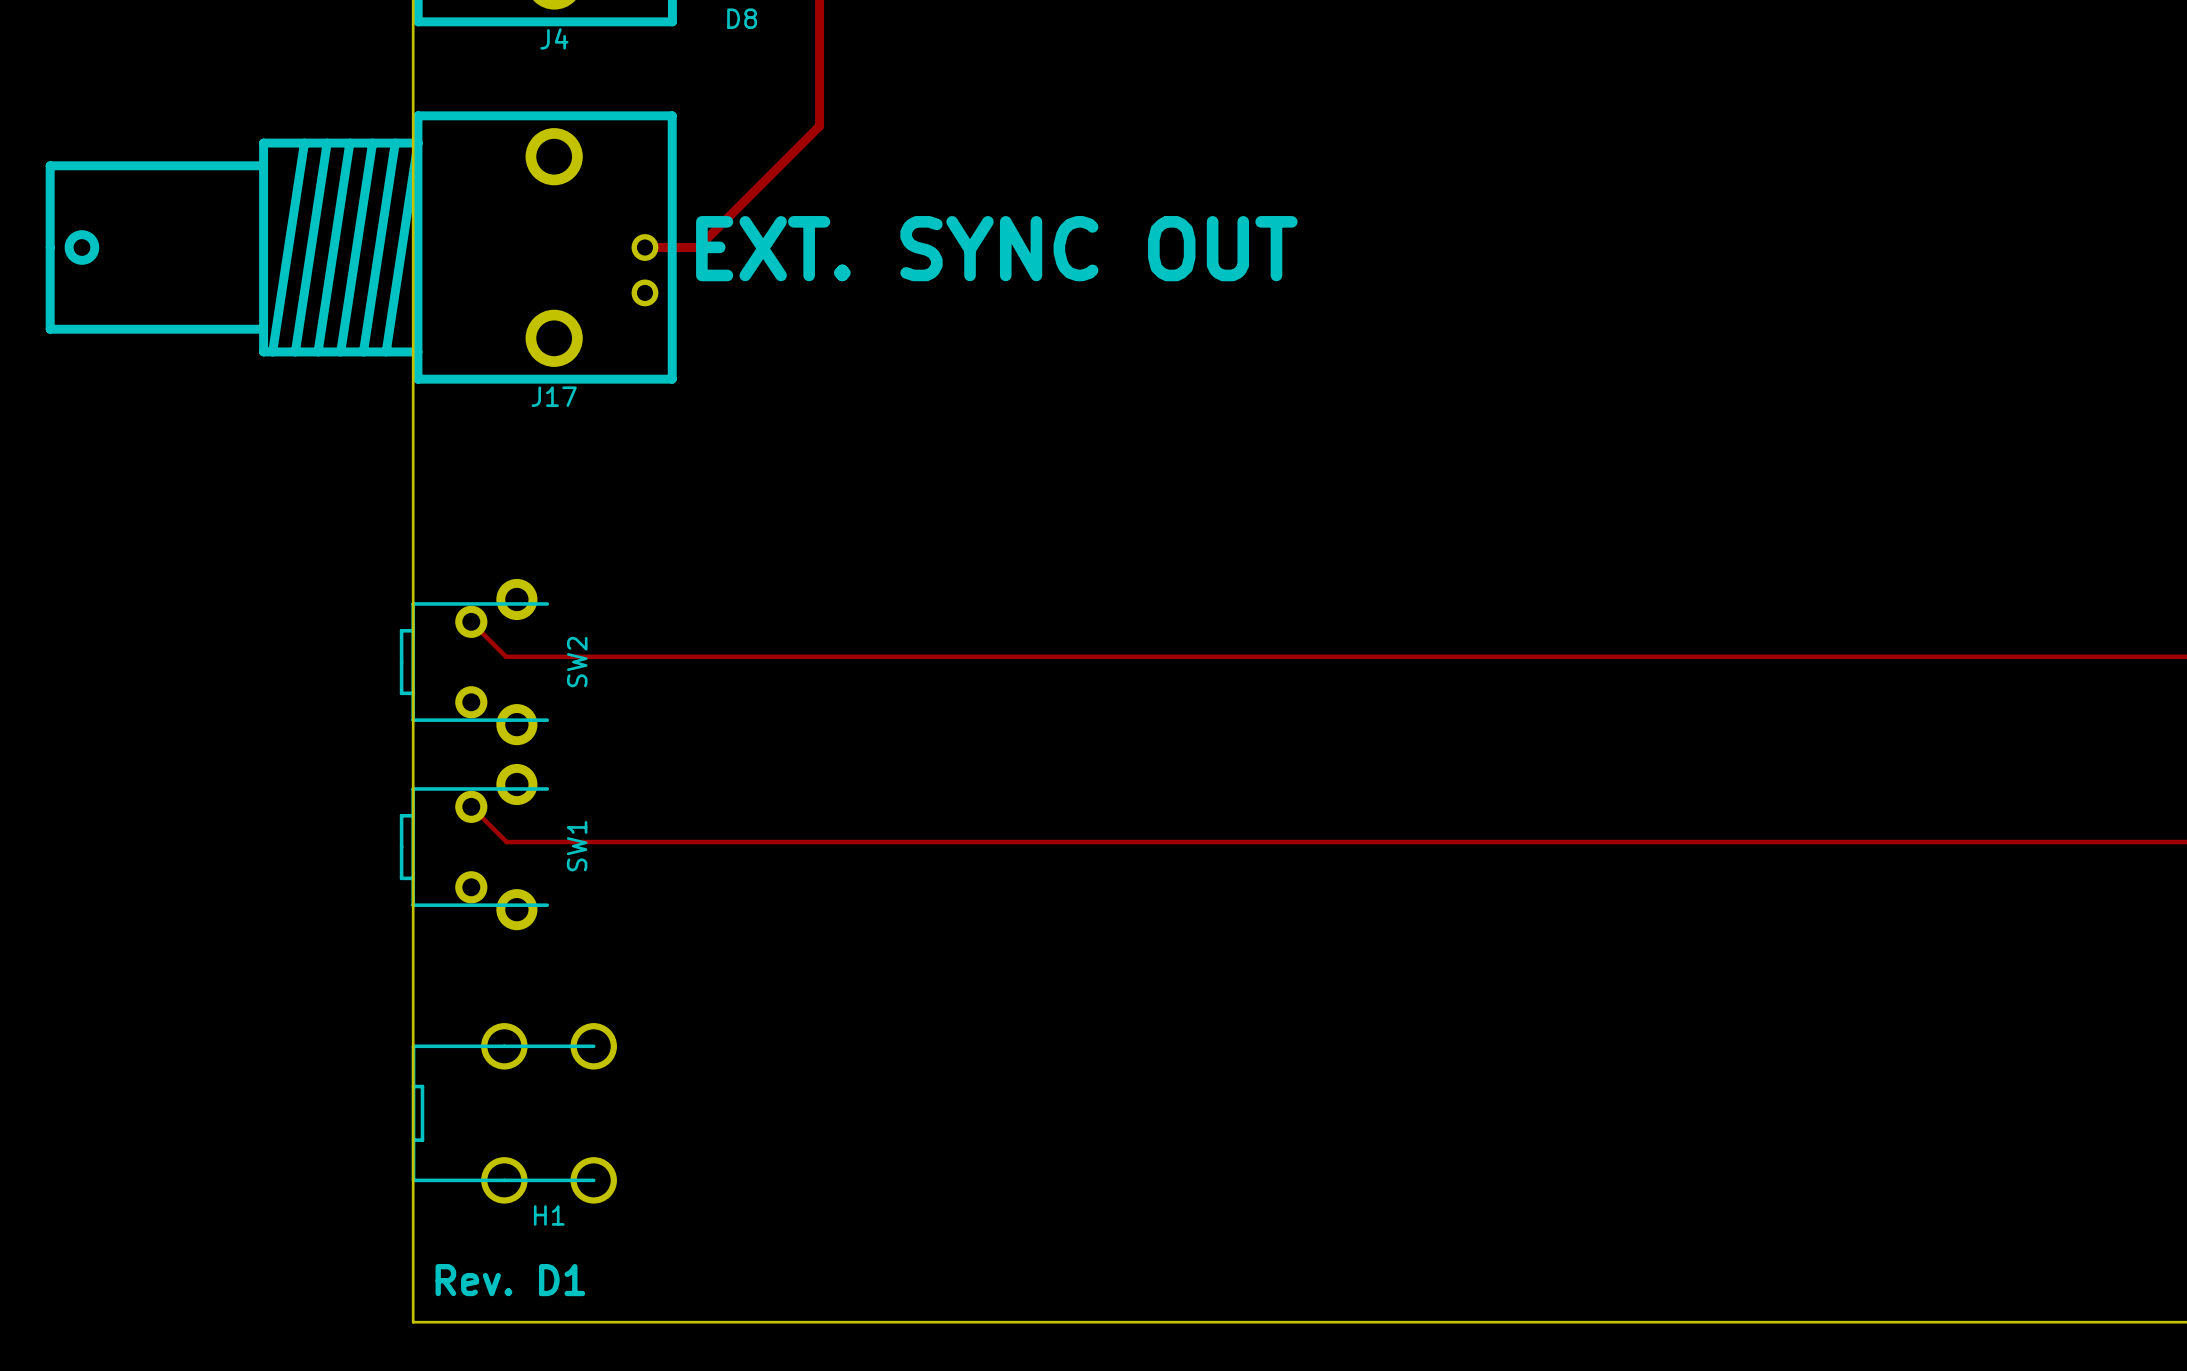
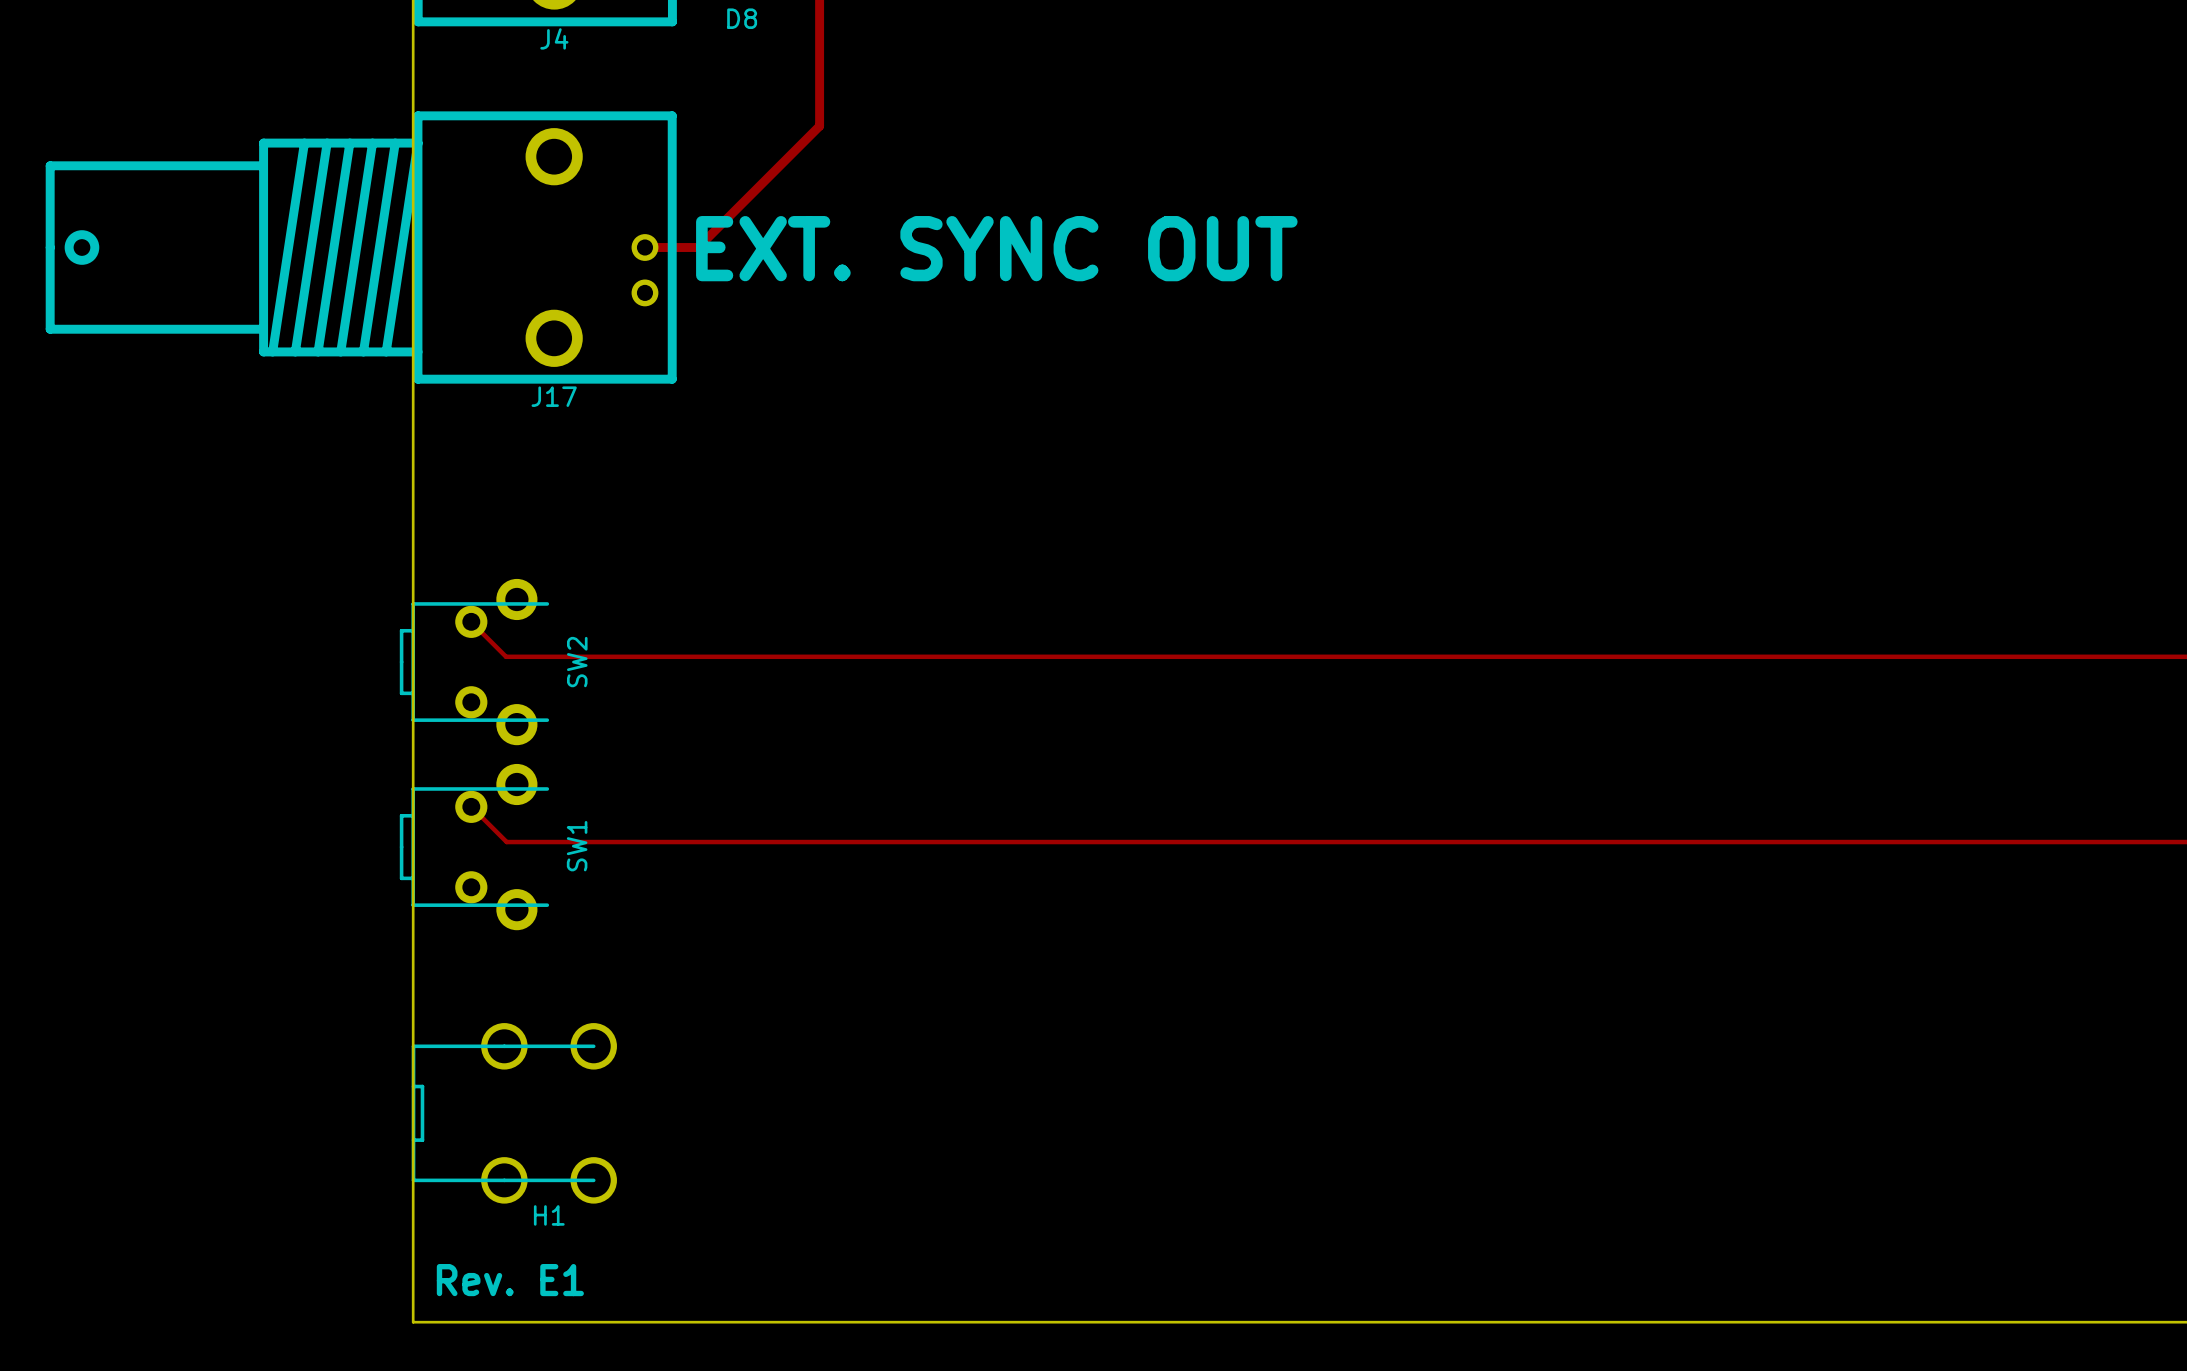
text: Rev. D1 (510, 1280) -> Rev. E1 (510, 1280)

